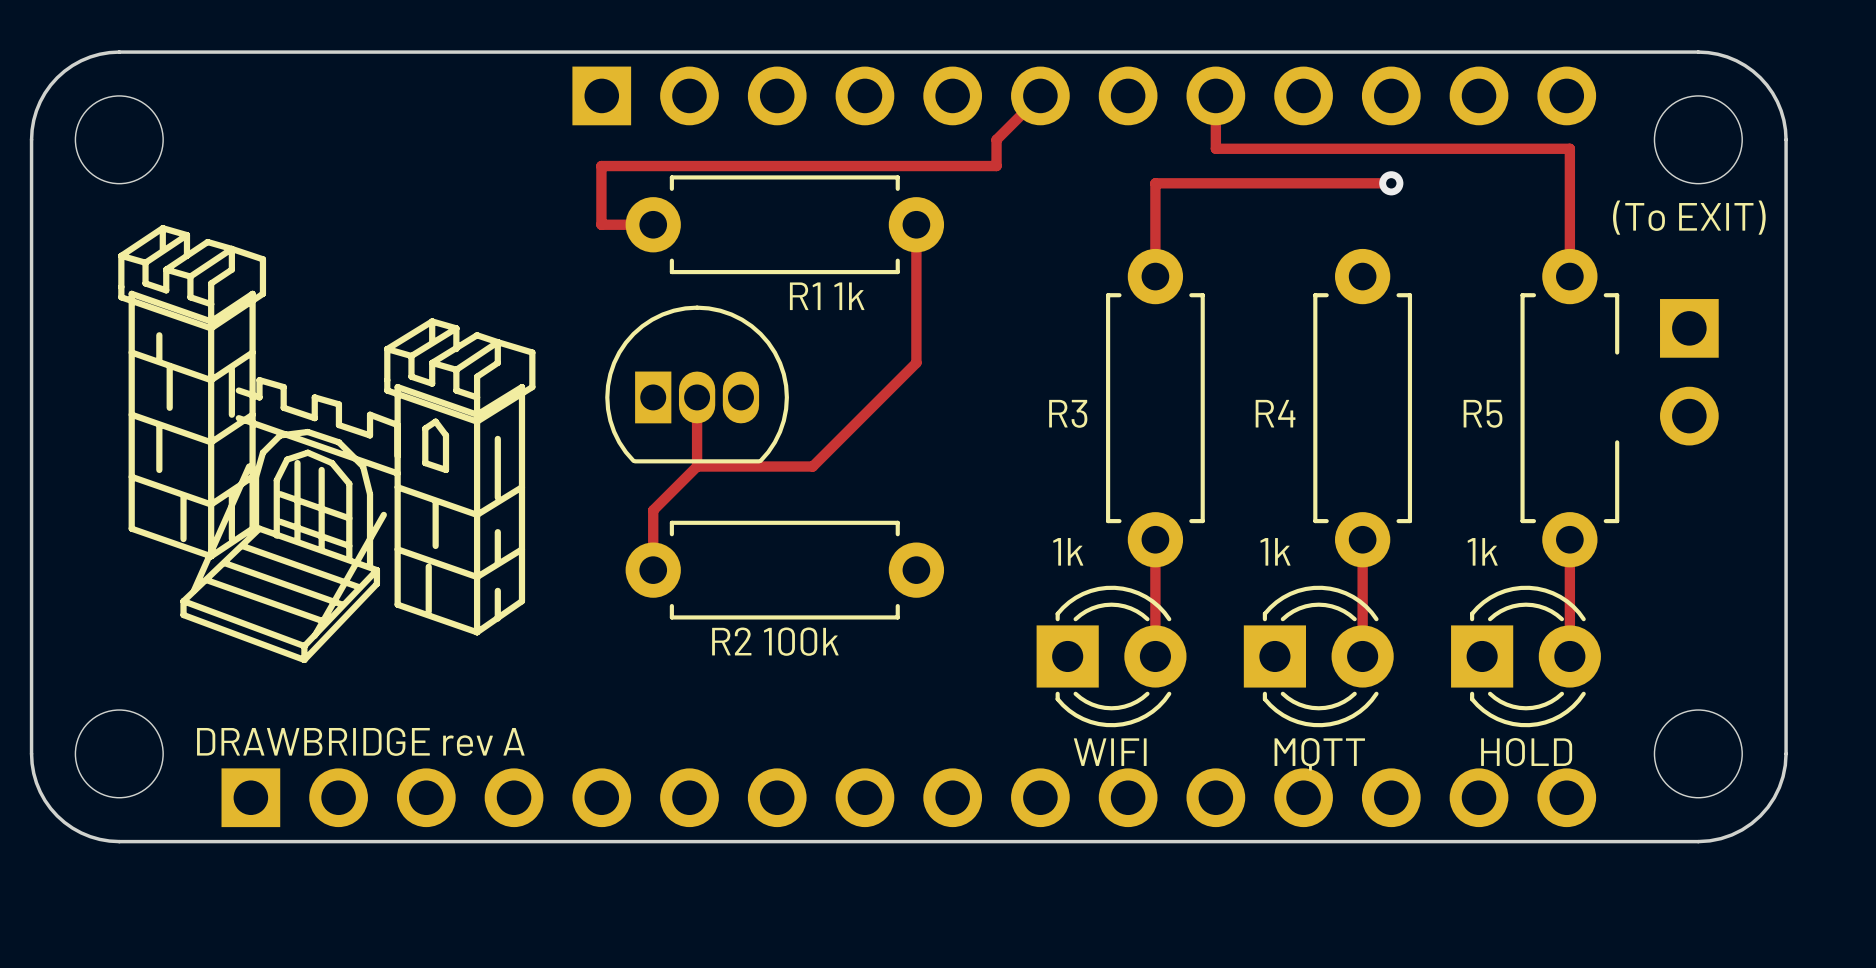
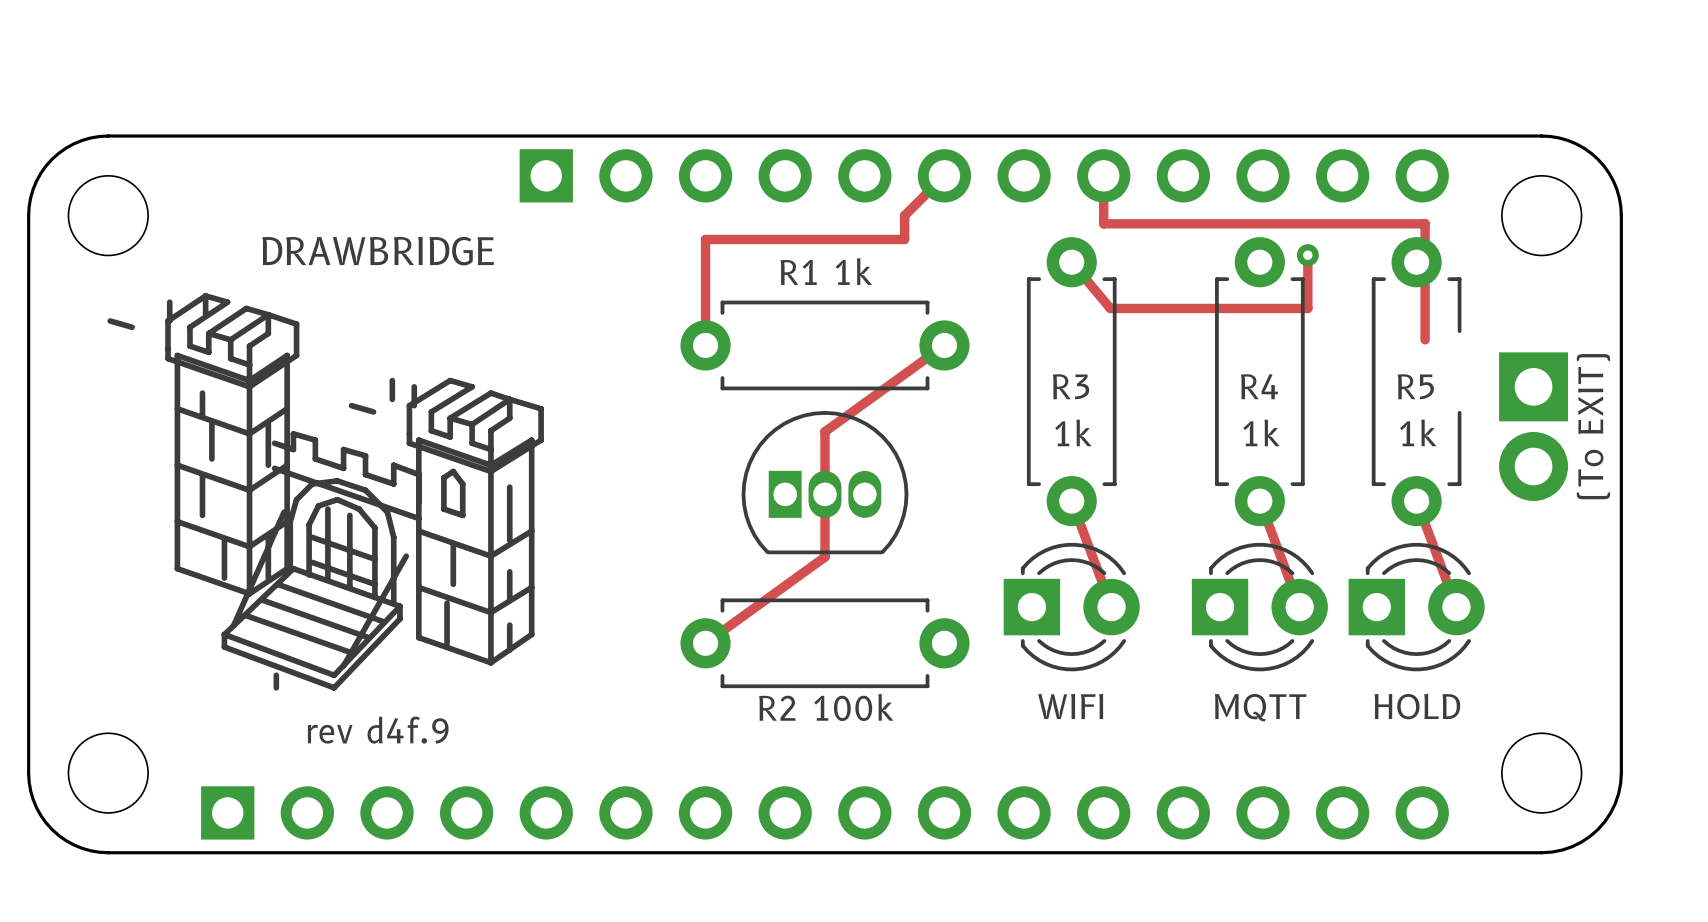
track: (777, 166) (601, 166) (601, 224) (653, 224) -> (705, 239) (705, 345)
text: none -> DRAWBRIDGE (378, 251)
track: (1391, 183) (1155, 183) (1155, 276) -> none
via position: (1391, 183) -> (1307, 255)
track: none -> (1307, 255) (1307, 308) (1110, 308) (1071, 262)
text rotation: 0° (1689, 217) -> 90° counterclockwise (1593, 426)
part position: (784, 224) -> (824, 345)
track: (916, 224) (916, 362) (812, 466) (697, 466) -> none
line: (162, 228) (121, 255) (121, 297) (211, 328) (262, 293) (262, 259) (231, 248) -> (205, 295) (168, 321) (168, 358) (249, 386) (296, 355) (296, 324) (268, 314)
line: (162, 228) (162, 248) -> (205, 295) (205, 314)
line: (162, 228) (186, 235) (145, 262) (145, 283) (166, 290) (166, 269) -> (205, 295) (227, 302) (189, 327) (189, 346) (208, 352) (208, 333)
line: (231, 248) (207, 242) (166, 269) -> (268, 314) (246, 308) (208, 333)
line: (231, 248) (190, 276) -> (268, 314) (230, 339)
line: (231, 248) (231, 269) (211, 283) (211, 556) -> (268, 314) (268, 333) (249, 346) (249, 593)
line: (166, 269) (190, 276) -> (208, 333) (230, 339)
line: (190, 276) (190, 297) (211, 304) -> (230, 339) (230, 358) (249, 364)
track: none -> (944, 345) (824, 431) (824, 557) (705, 643)
text position: R1 1k (827, 296) -> R1 1k (826, 271)
part footprint: [1660, 299, 1719, 446] -> [1499, 352, 1569, 501]
line: (159, 335) (159, 359) -> (202, 393) (202, 415)
line: (497, 342) (456, 369) -> (509, 399) (472, 424)
line: (497, 342) (477, 335) (432, 362) -> (509, 399) (490, 393) (450, 418)
line: (497, 342) (532, 352) (532, 387) (477, 421) (387, 390) (387, 349) (432, 321) (456, 328) (411, 356) (411, 376) (432, 383) (432, 362) -> (509, 399) (541, 408) (541, 440) (490, 471) (409, 443) (409, 405) (450, 380) (472, 386) (431, 411) (431, 430) (450, 437) (450, 418)
line: (497, 342) (497, 362) (477, 376) (477, 632) -> (509, 399) (509, 418) (490, 430) (490, 662)
line: (131, 352) (211, 380) (252, 352) -> (177, 408) (249, 433) (287, 408)
line: (432, 362) (456, 369) -> (450, 418) (472, 424)
line: (169, 366) (169, 407) -> (211, 421) (211, 458)
line: (231, 369) (231, 414) -> (268, 424) (268, 465)
line: (456, 369) (456, 390) (477, 397) -> (472, 424) (472, 443) (490, 449)
text: none -> 1k (1073, 432)
text: none -> 1k (1261, 432)
text: none -> 1k (1418, 432)
part position: (697, 384) -> (824, 482)
line: (238, 390) (259, 397) (259, 380) (283, 387) (283, 407) (314, 418) (314, 397) (338, 404) (338, 425) (370, 435) (370, 414) (397, 425) -> (274, 443) (293, 449) (293, 433) (315, 440) (315, 458) (343, 468) (343, 449) (365, 455) (365, 474) (393, 484) (393, 465) (418, 474)
track: (697, 397) (697, 466) -> none
part position: (1155, 408) -> (1071, 381)
part position: (1362, 408) -> (1259, 381)
part position: (1569, 408) -> (1416, 381)
text position: R3 (1068, 413) -> R3 (1071, 386)
text position: R4 (1275, 413) -> R4 (1259, 386)
text position: R5 (1483, 413) -> R5 (1415, 386)
line: (131, 414) (211, 442) (252, 414) -> (177, 465) (249, 490) (287, 465)
line: (238, 418) (397, 473) -> (274, 468) (418, 518)
line: (435, 421) (425, 428) (425, 463) (446, 469) (446, 435) (435, 421) -> (453, 471) (443, 477) (443, 509) (462, 515) (462, 484) (453, 471)
line: (159, 425) (159, 469) -> (202, 474) (202, 515)
line: (497, 438) (497, 497) -> (509, 487) (509, 540)
track: none -> (1071, 501) (1111, 607)
track: none -> (1259, 501) (1299, 607)
track: none -> (1416, 501) (1456, 607)
line: (297, 463) (297, 539) -> (327, 509) (327, 578)
line: (249, 466) (193, 590) -> (284, 512) (233, 625)
track: (697, 466) (653, 510) (653, 570) -> none
line: (321, 469) (321, 549) -> (349, 515) (349, 587)
line: (131, 476) (211, 504) (252, 476) -> (177, 521) (249, 546) (287, 521)
line: (397, 487) (477, 514) (521, 487) -> (418, 531) (490, 556) (531, 531)
line: (231, 494) (231, 539) -> (268, 537) (268, 578)
line: (280, 494) (349, 518) -> (312, 537) (374, 559)
line: (183, 497) (183, 539) -> (224, 540) (224, 578)
line: (435, 501) (435, 545) -> (453, 543) (453, 584)
line: (383, 514) (314, 635) -> (406, 556) (343, 665)
line: (280, 521) (349, 545) -> (312, 562) (374, 584)
line: (256, 528) (256, 476) (262, 452) (280, 435) (307, 431) (338, 442) (363, 466) (370, 494) (370, 566) -> (290, 568) (290, 521) (296, 499) (312, 484) (337, 480) (365, 490) (387, 512) (393, 537) (393, 603)
line: (497, 532) (497, 563) -> (509, 571) (509, 600)
line: (276, 535) (276, 480) (287, 459) (307, 452) (332, 463) (349, 483) (349, 559) -> (309, 574) (309, 524) (318, 505) (337, 499) (359, 509) (374, 527) (374, 596)
track: (1155, 539) (1155, 656) -> none
track: (1362, 539) (1362, 656) -> none
track: (1569, 539) (1569, 656) -> none
line: (242, 545) (359, 587) -> (277, 584) (384, 621)
line: (397, 549) (477, 577) (521, 549) -> (418, 587) (490, 612) (531, 587)
text: 1k (1068, 551) -> none
text: 1k (1275, 551) -> none
text: 1k (1482, 551) -> none
line: (211, 556) (131, 528) (131, 293) (211, 321) (252, 293) (252, 528) (211, 556) -> (249, 593) (177, 568) (177, 355) (249, 380) (287, 355) (287, 568) (249, 593)
line: (224, 563) (342, 604) -> (262, 600) (368, 637)
line: (428, 566) (428, 611) -> (447, 603) (447, 643)
line: (376, 570) (259, 528) (183, 601) -> (400, 606) (293, 568) (224, 634)
line: (376, 570) (304, 646) (183, 601) -> (400, 606) (334, 675) (224, 634)
line: (376, 570) (376, 583) (304, 659) (183, 615) (183, 601) -> (400, 606) (400, 618) (334, 687) (224, 647) (224, 634)
part position: (784, 570) -> (824, 643)
part: none -> (1071, 607)
part: none -> (1259, 607)
part: none -> (1416, 607)
line: (207, 580) (325, 621) -> (246, 615) (352, 653)
line: (497, 590) (497, 618) -> (509, 625) (509, 650)
line: (477, 632) (397, 604) (397, 387) (477, 414) (521, 387) (521, 601) (477, 632) -> (490, 662) (418, 637) (418, 440) (490, 465) (531, 440) (531, 634) (490, 662)
text position: R2 100k (775, 641) -> R2 100k (826, 707)
part: (1111, 656) -> none
part: (1318, 656) -> none
part: (1526, 656) -> none
text: none -> rev d4f.9 (378, 730)
text: DRAWBRIDGE rev A (360, 741) -> none
text position: WIFI (1110, 752) -> WIFI (1070, 706)
text position: HOLD (1526, 752) -> HOLD (1417, 706)
text position: MQTT (1319, 754) -> MQTT (1260, 707)

